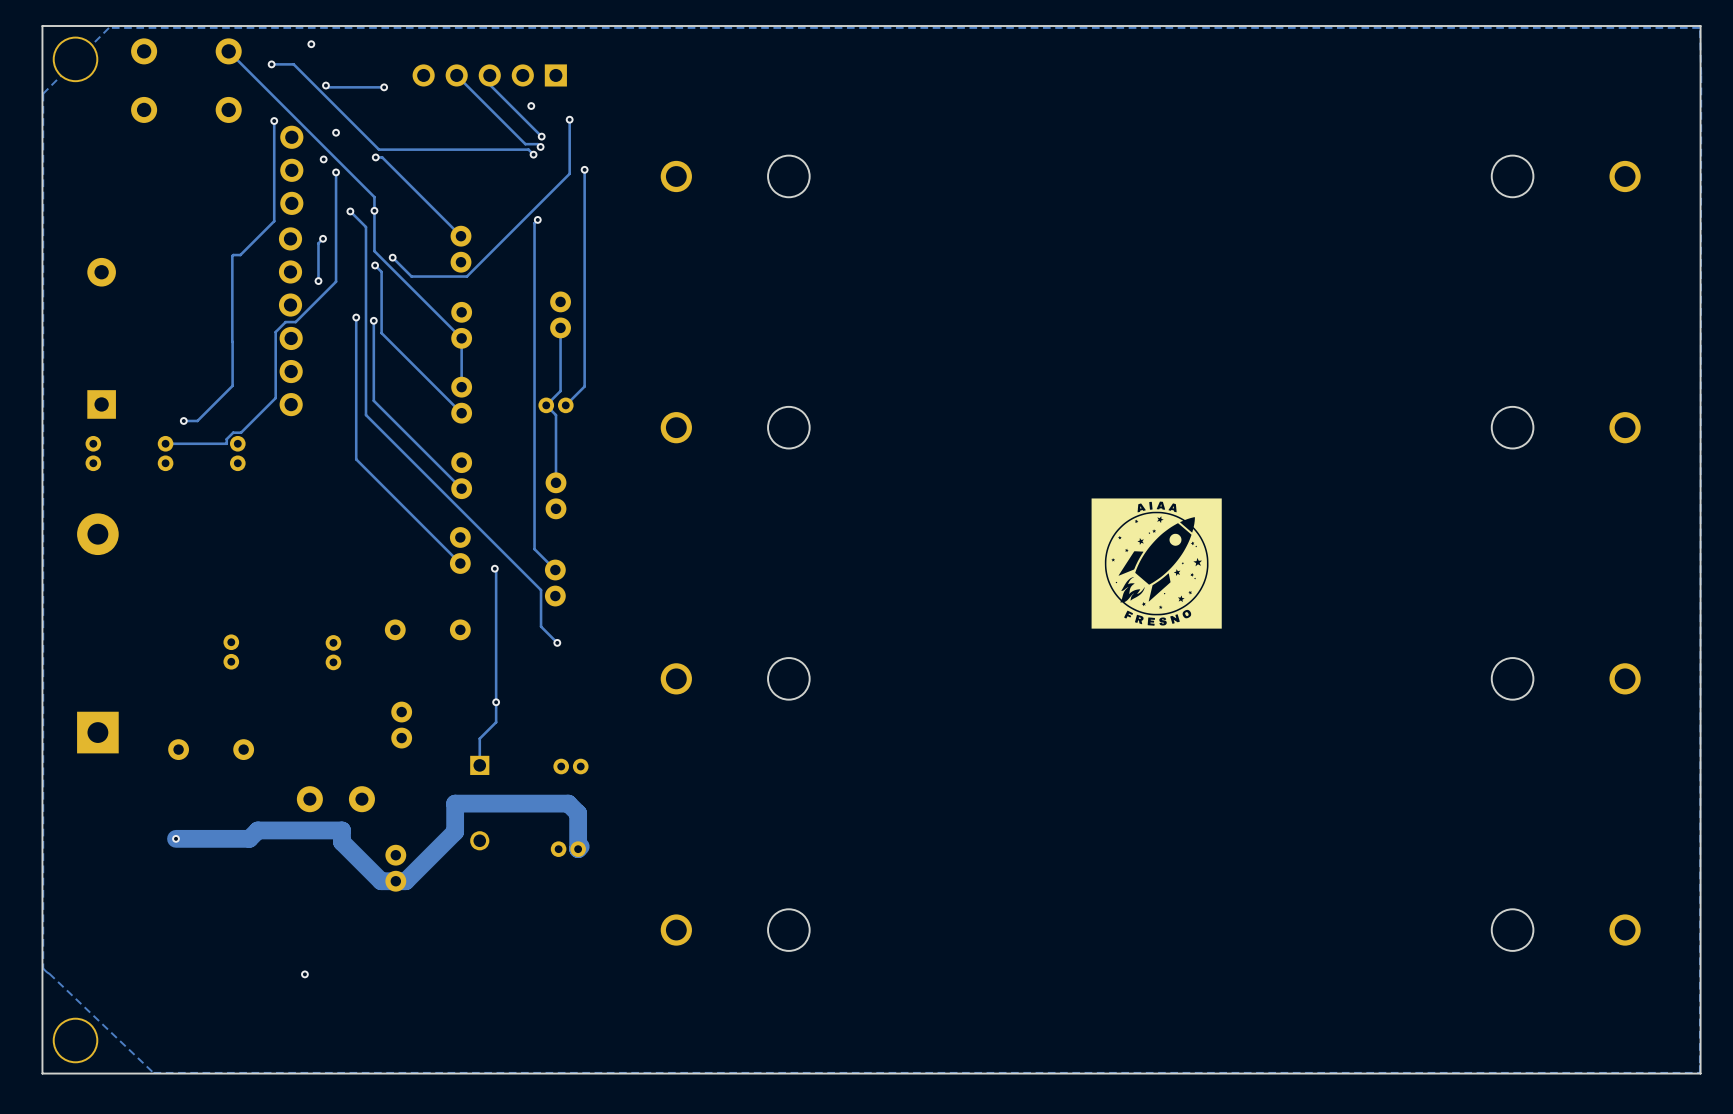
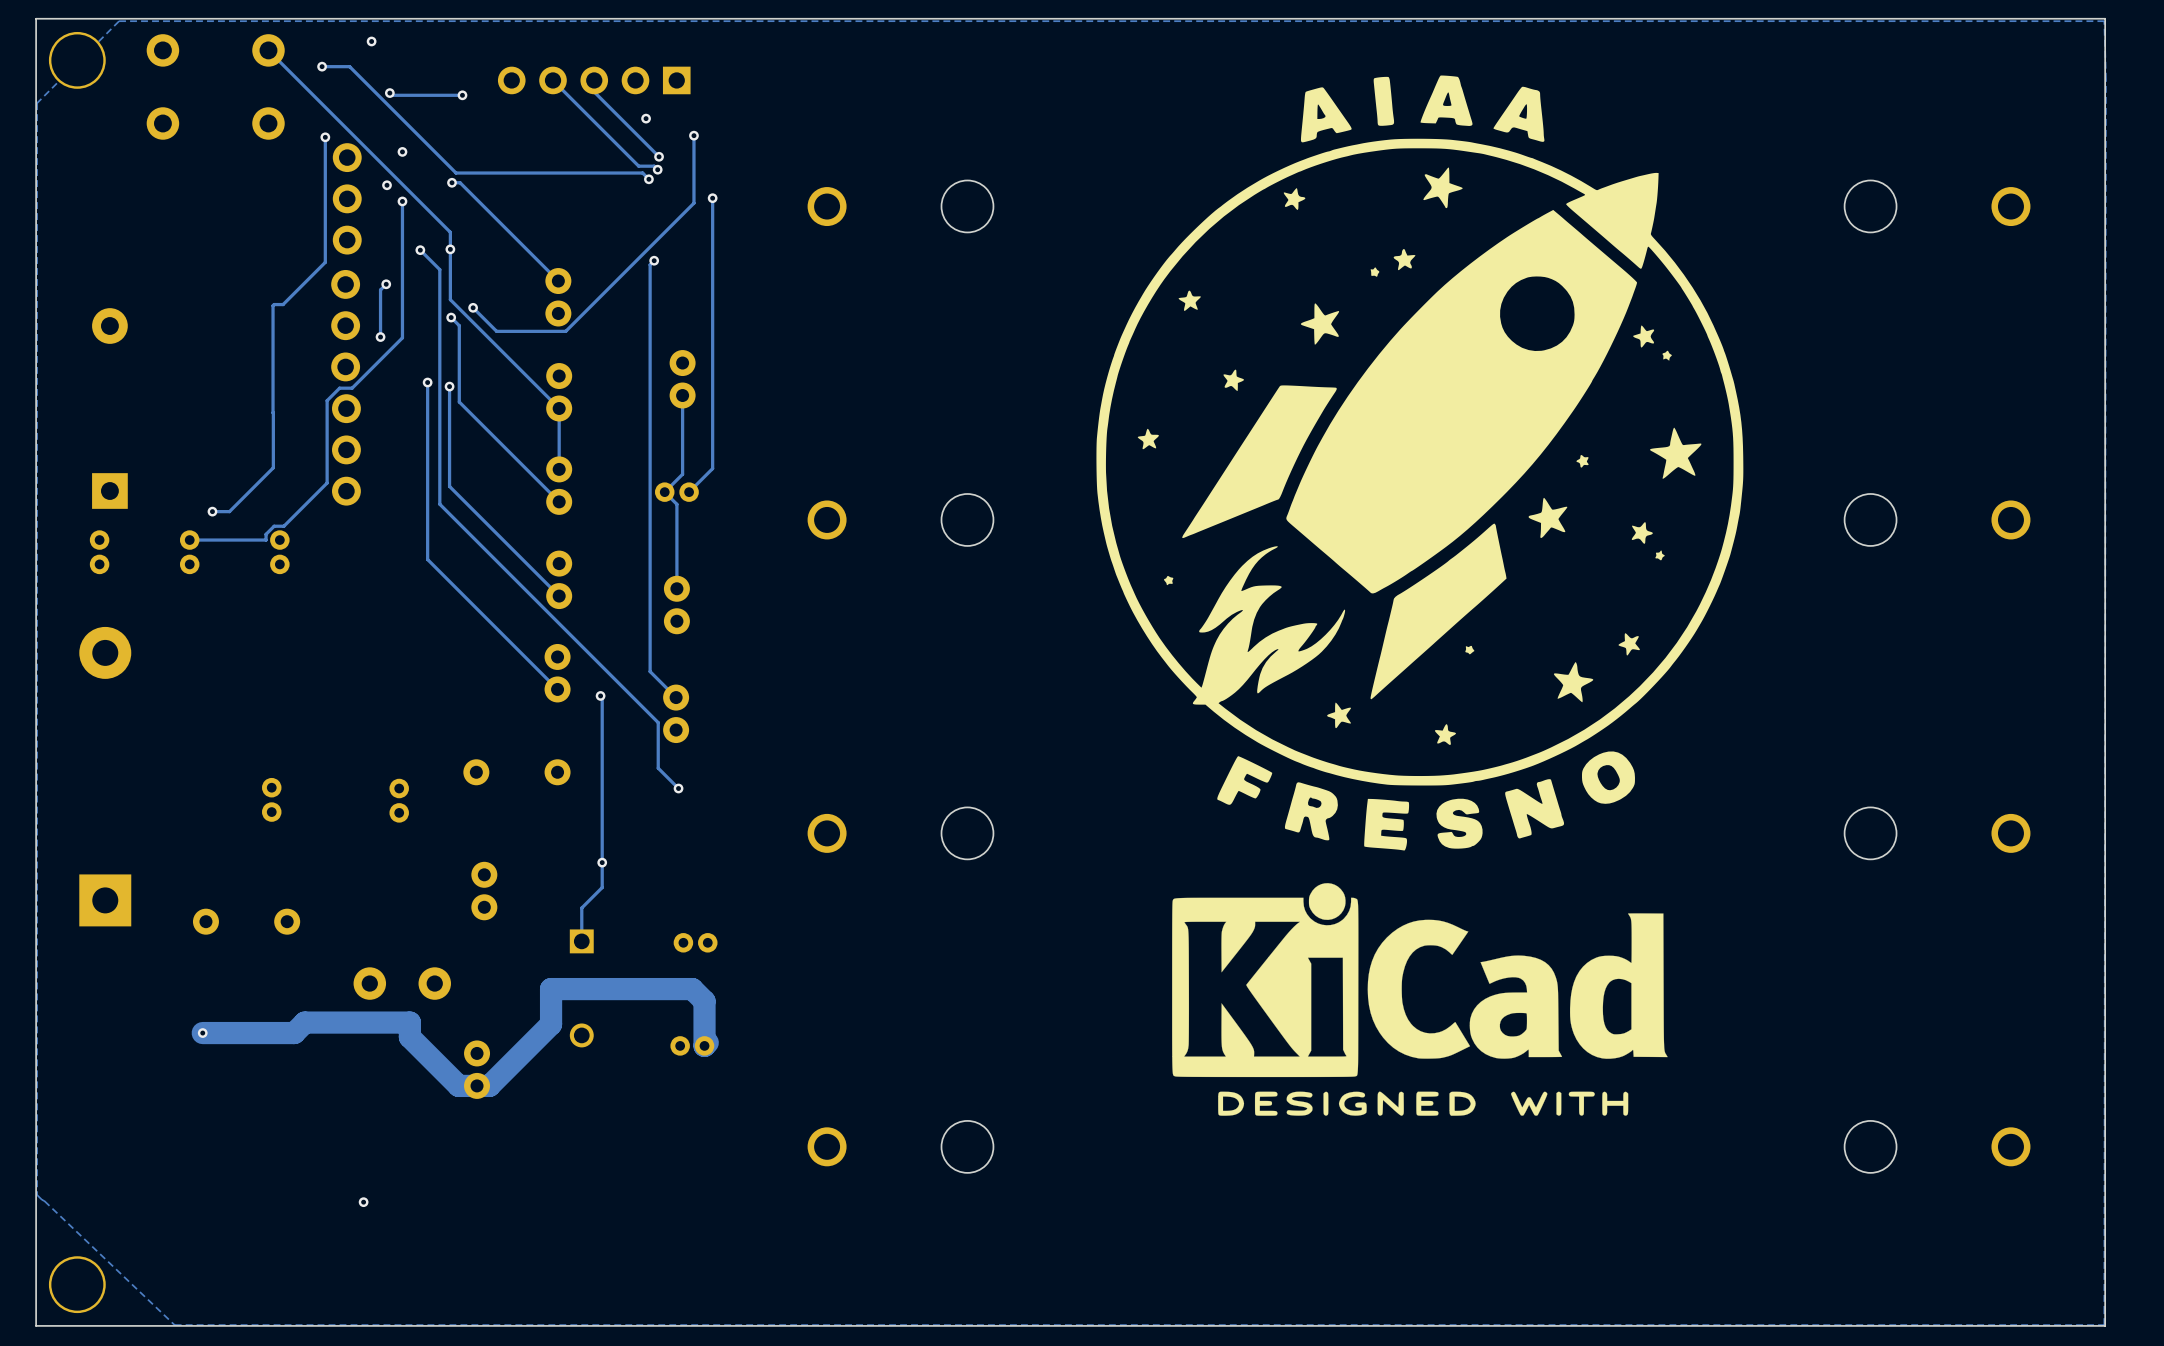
part: none -> (1419, 463)
drawing: [1091, 498, 1222, 629] -> none
drawing: none -> [1172, 883, 1668, 1116]

